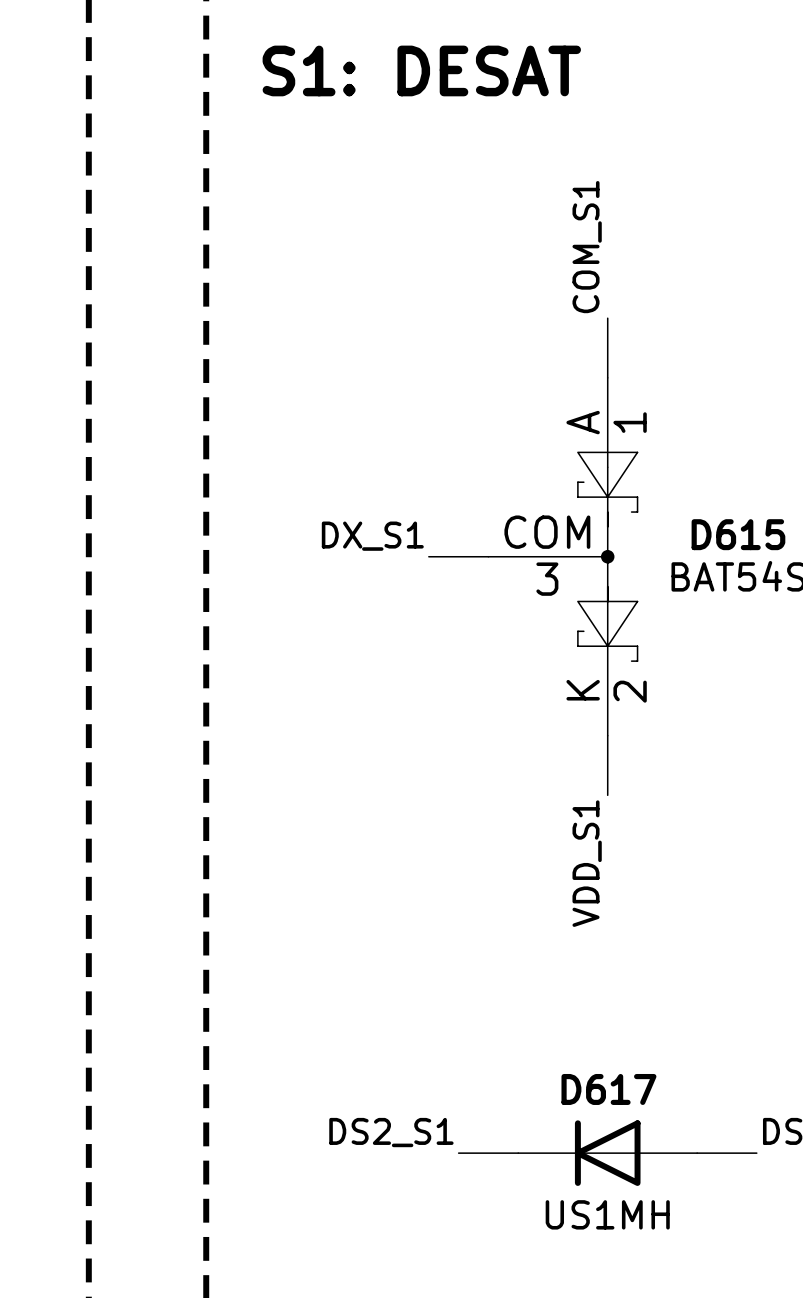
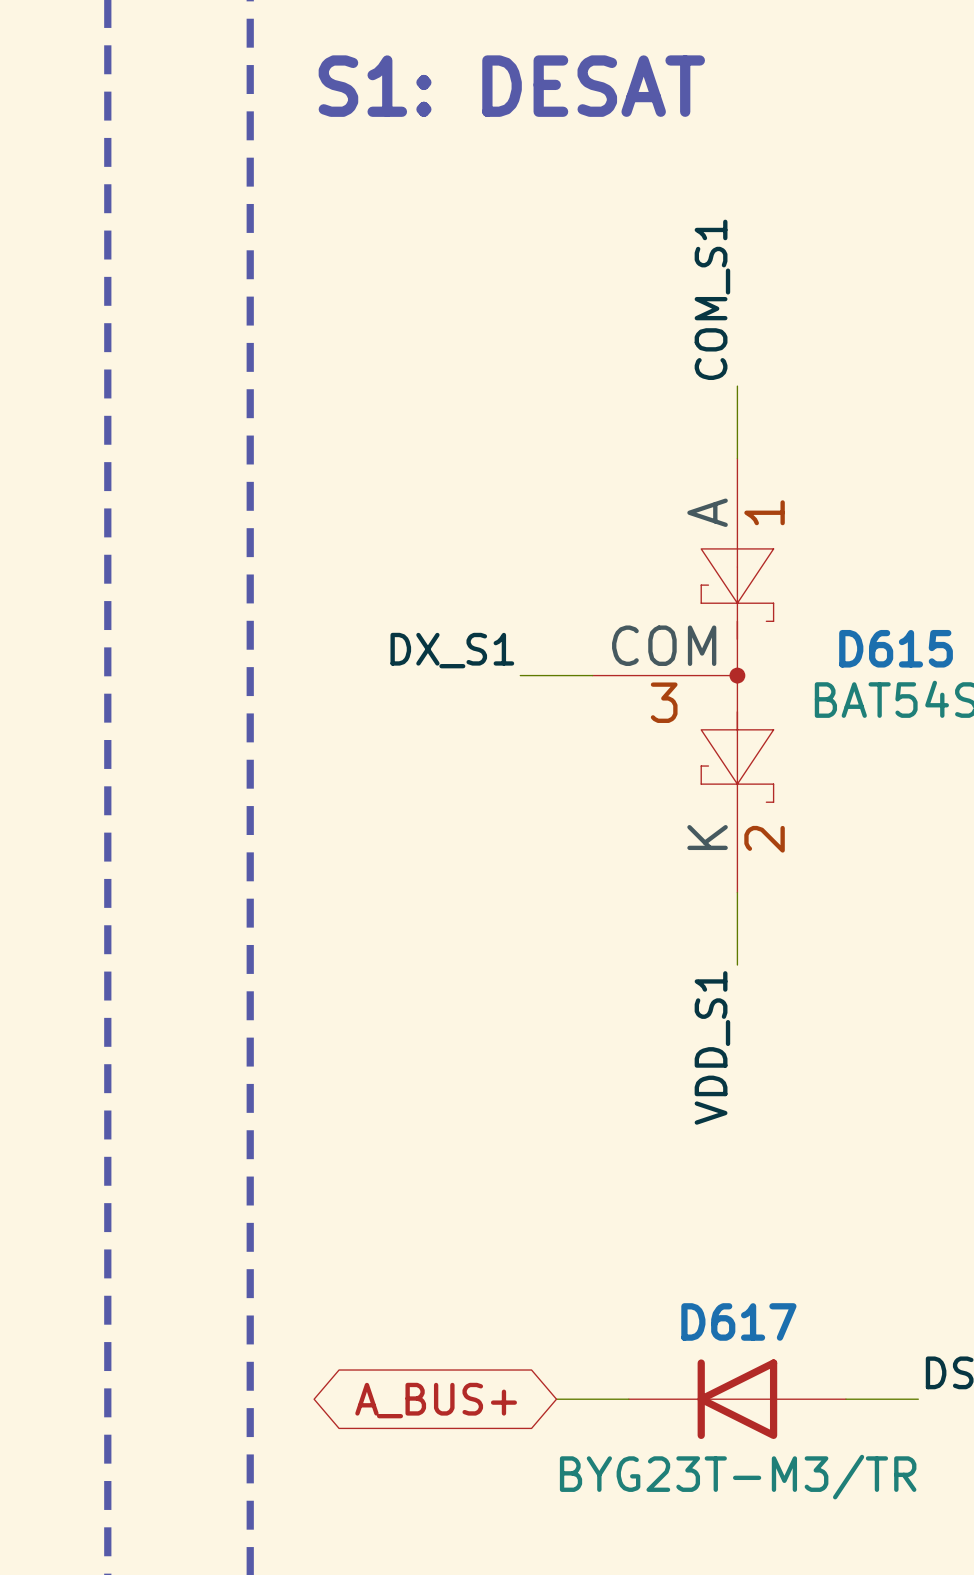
label: DS2_S1 (391, 1132) -> none
global label: none -> A_BUS+ (436, 1400)
D617 value: US1MH (607, 1214) -> BYG23T-M3/TR (738, 1477)

